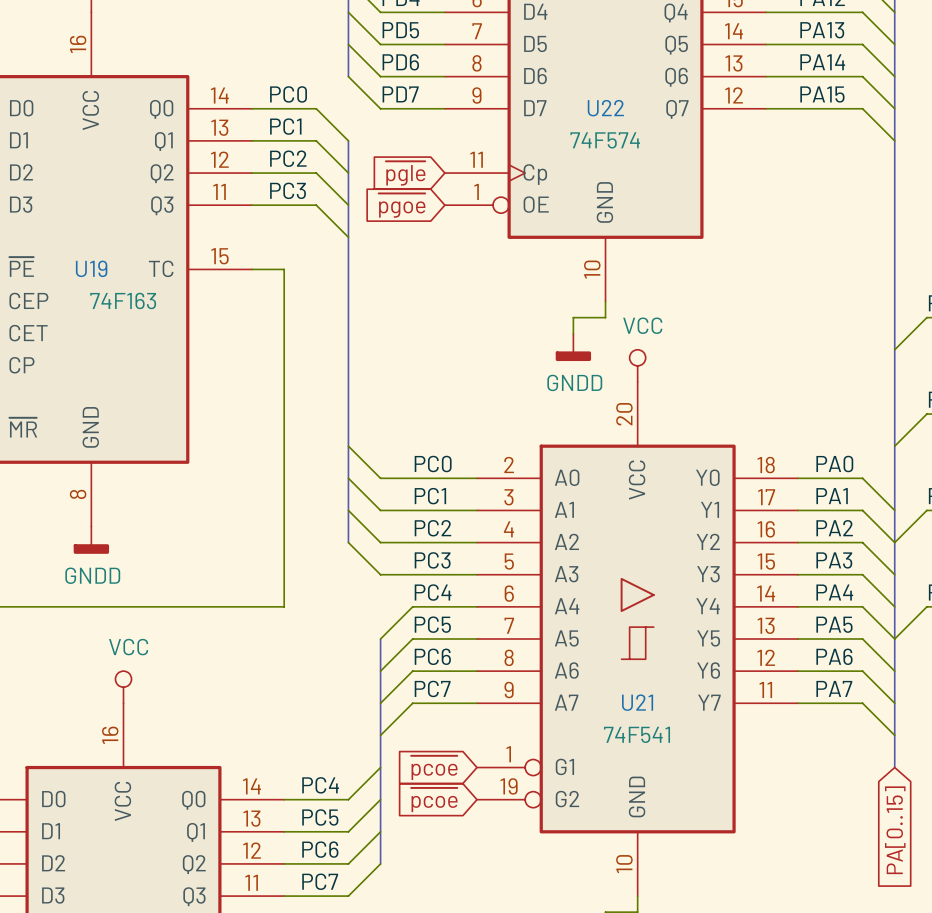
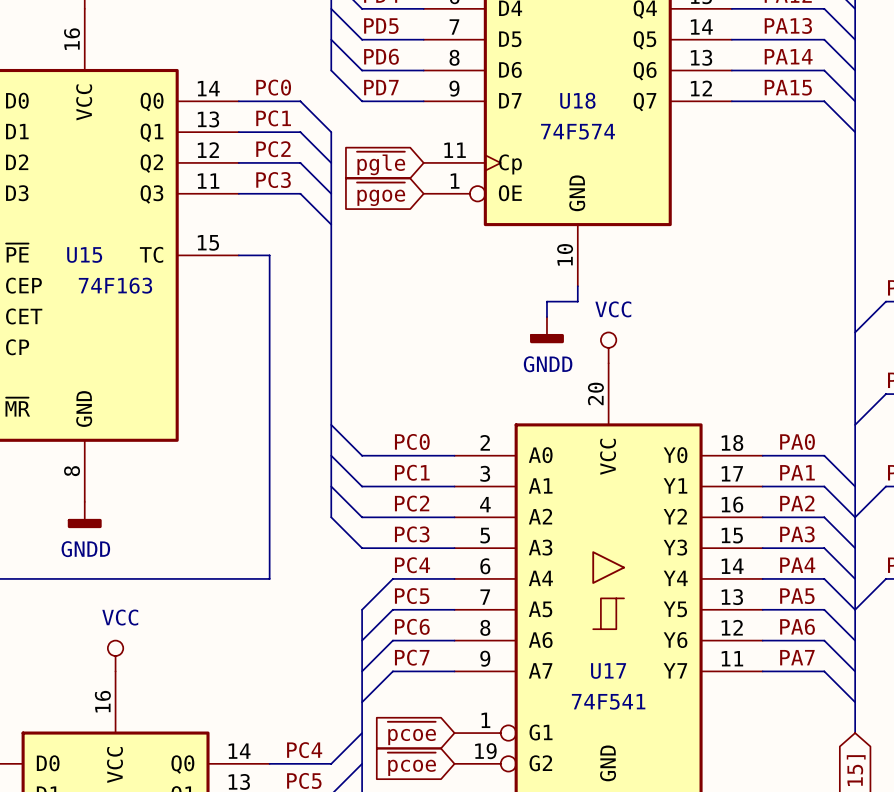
U22 name: U22 (605, 108) -> U18 (577, 100)
U19 name: U19 (91, 268) -> U15 (84, 254)
U21 name: U21 (637, 702) -> U17 (608, 670)

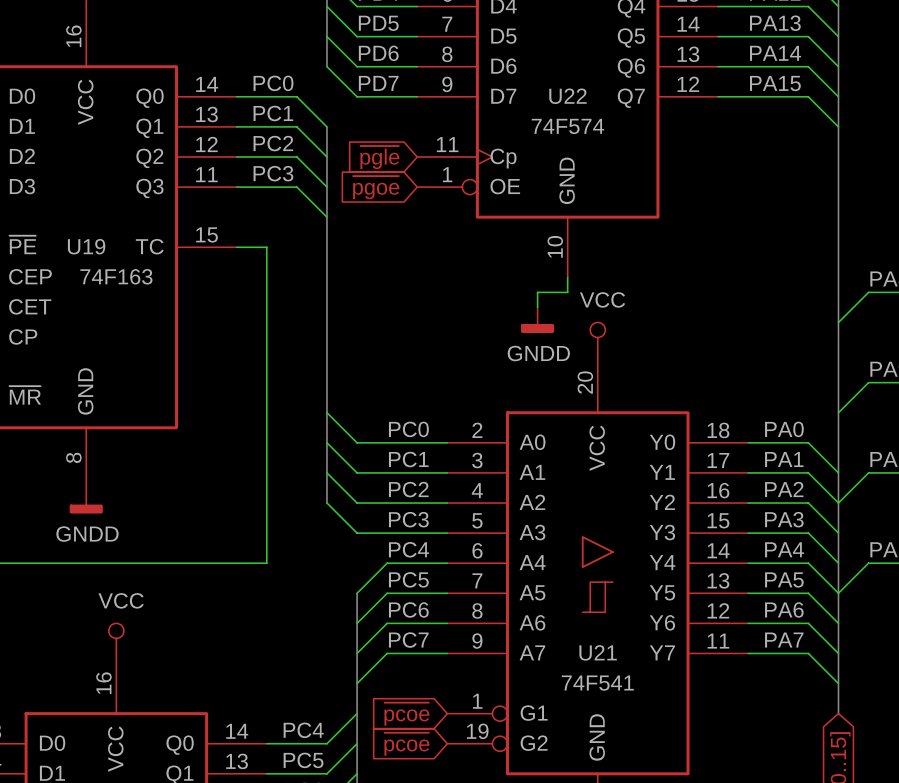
U18 name: U18 (577, 100) -> U22 (567, 96)
U15 name: U15 (84, 254) -> U19 (86, 246)
U17 name: U17 (608, 670) -> U21 (598, 652)

